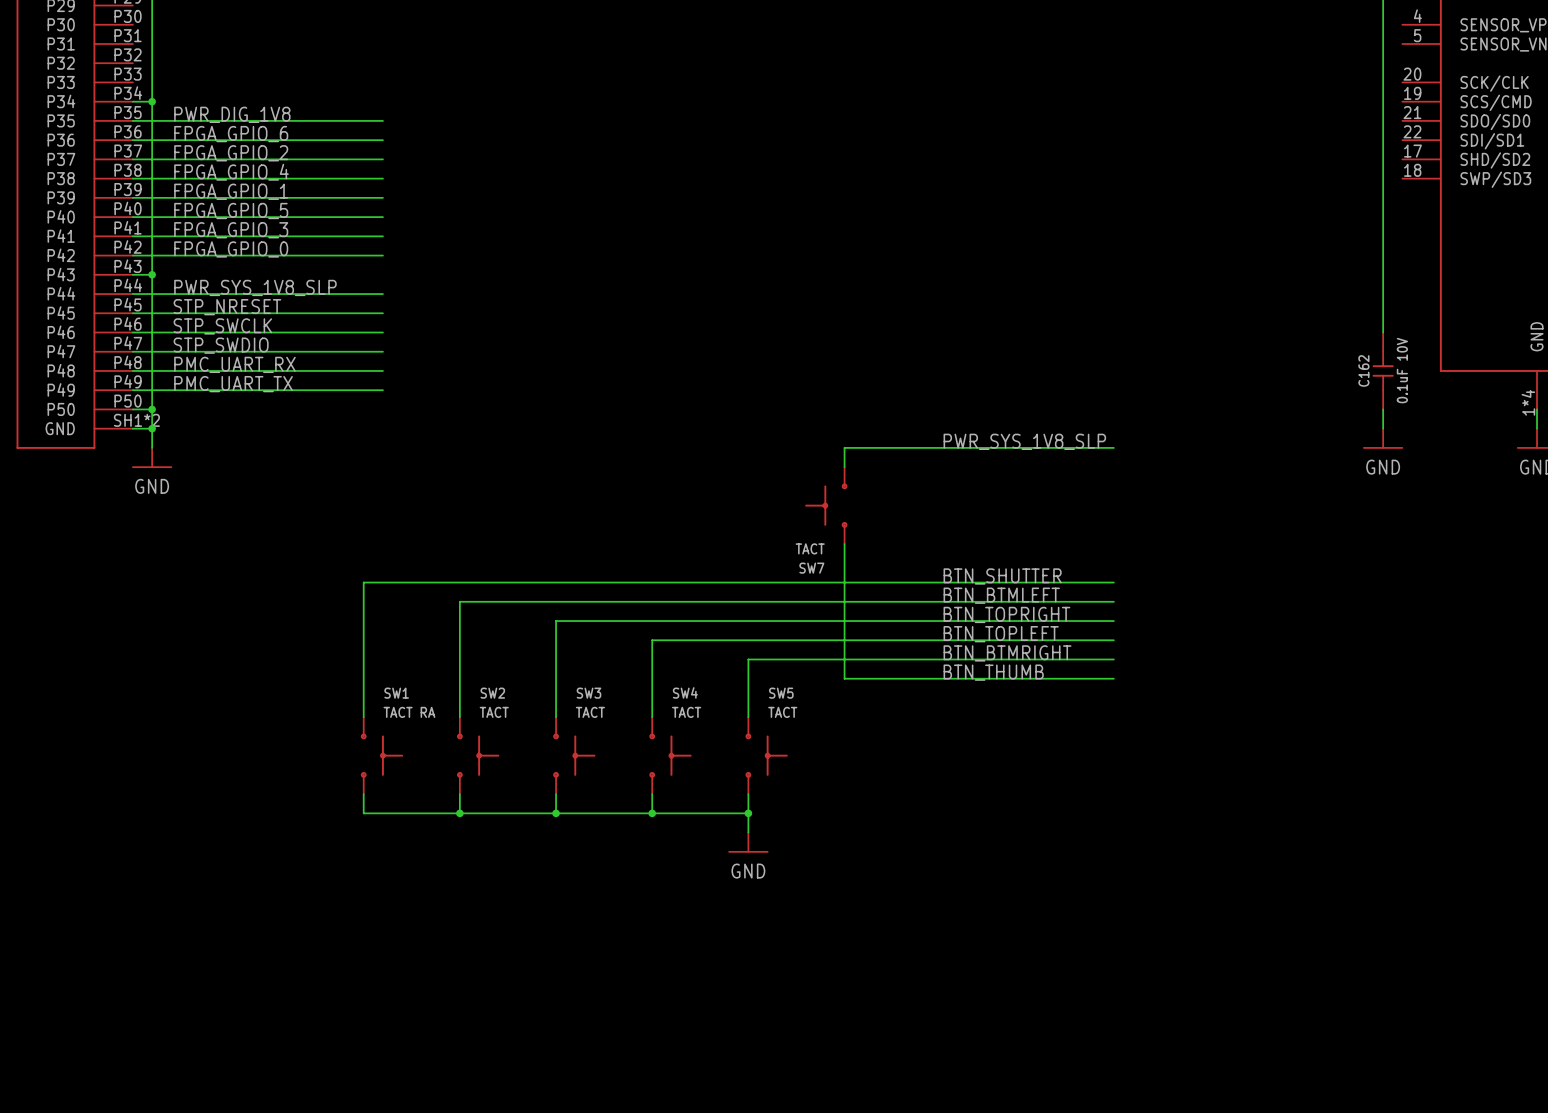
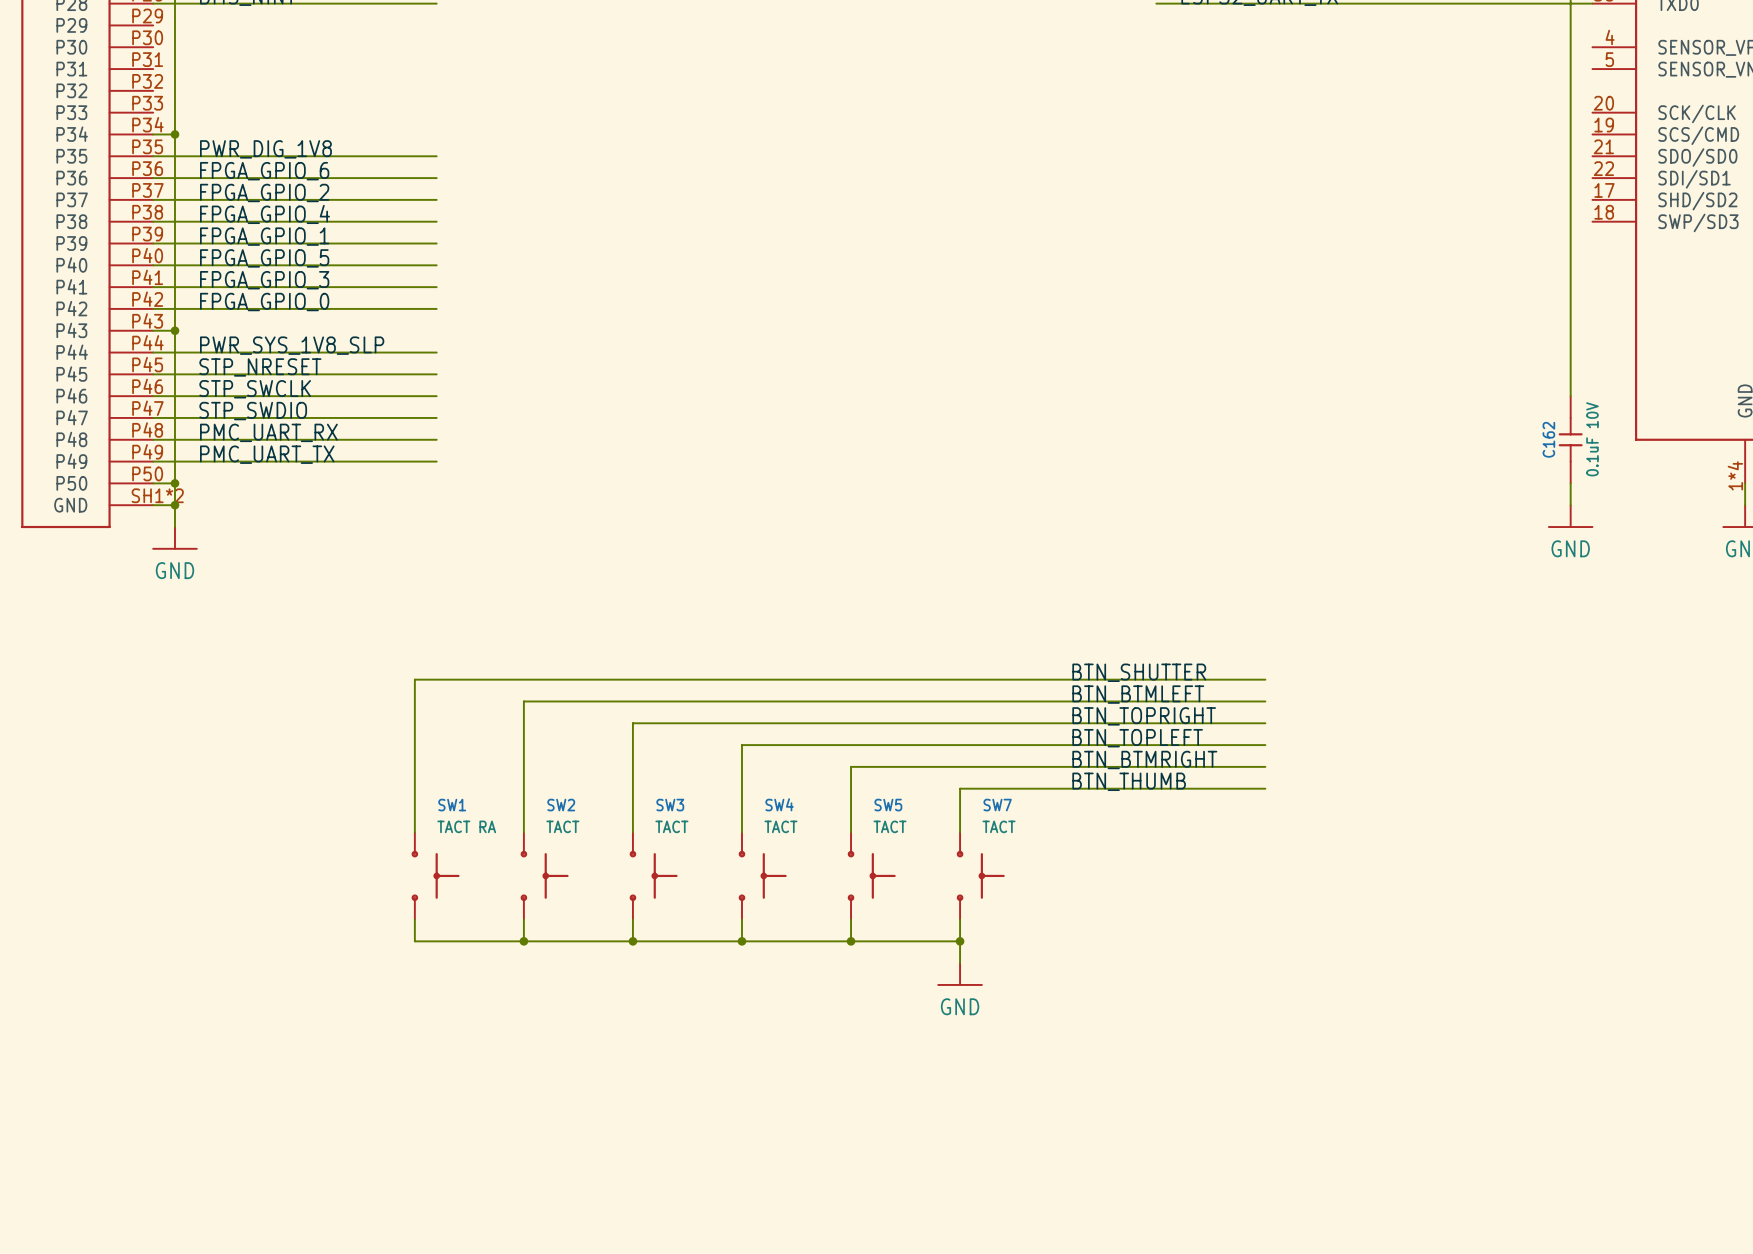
label: PWR_SYS_1V8_SLP (1024, 441) -> none
wire: (1113, 447) (844, 447) (844, 467) -> none
SW7 rotation: 0° (826, 505) -> 180° (980, 875)
SW7 position: (826, 505) -> (980, 875)
wire: (844, 544) (844, 678) -> (960, 832) (960, 788)
wire: none -> (960, 919) (960, 963)
wire: (748, 813) (748, 832) -> (851, 941) (960, 941)
junction: none -> (960, 941)
power symbol position: GND (748, 842) -> GND (960, 974)

